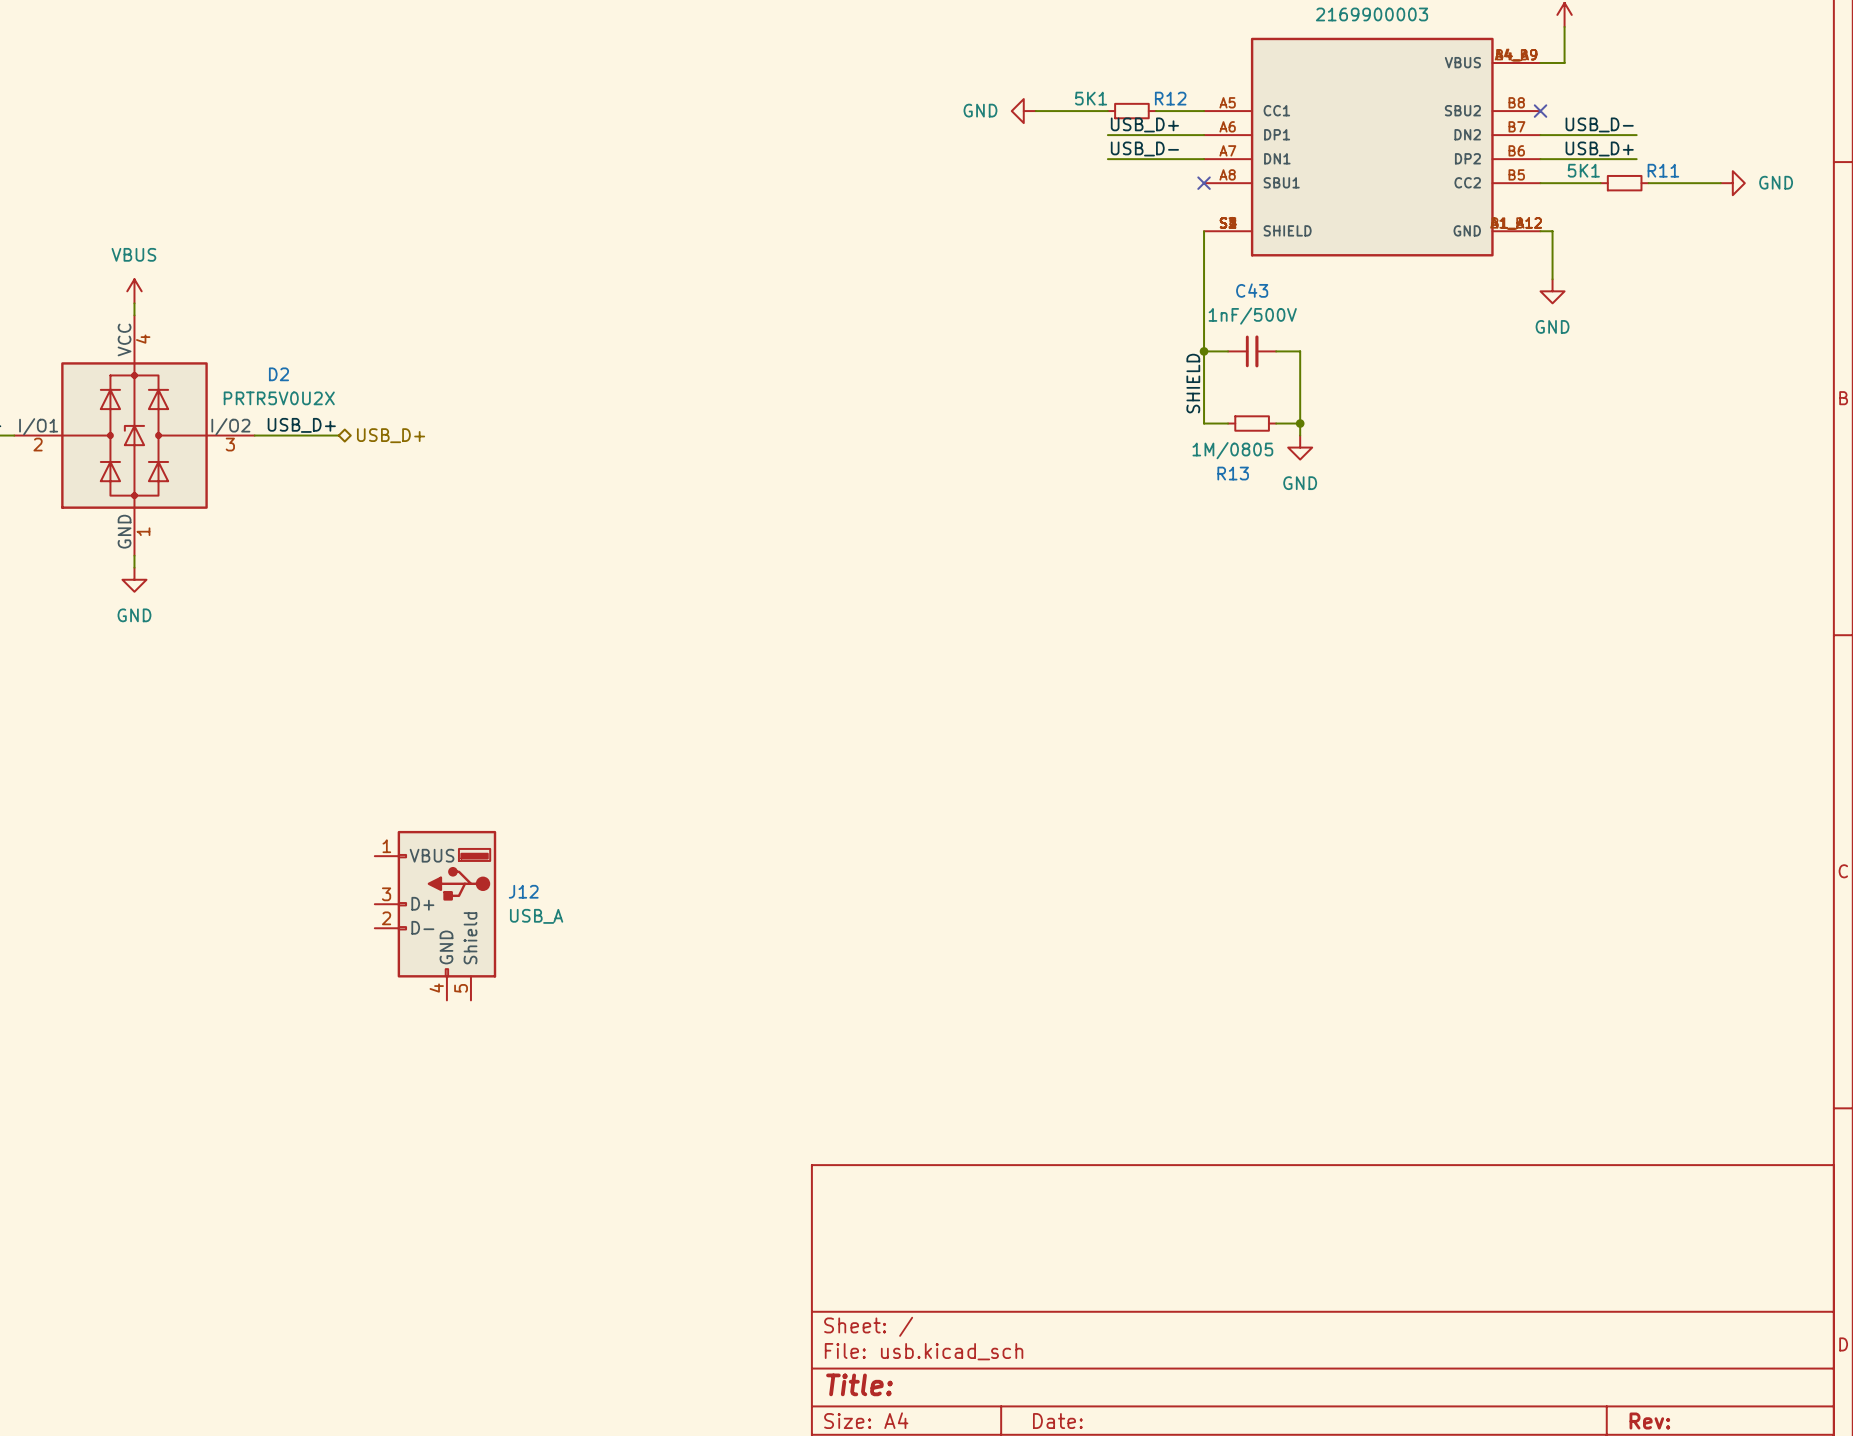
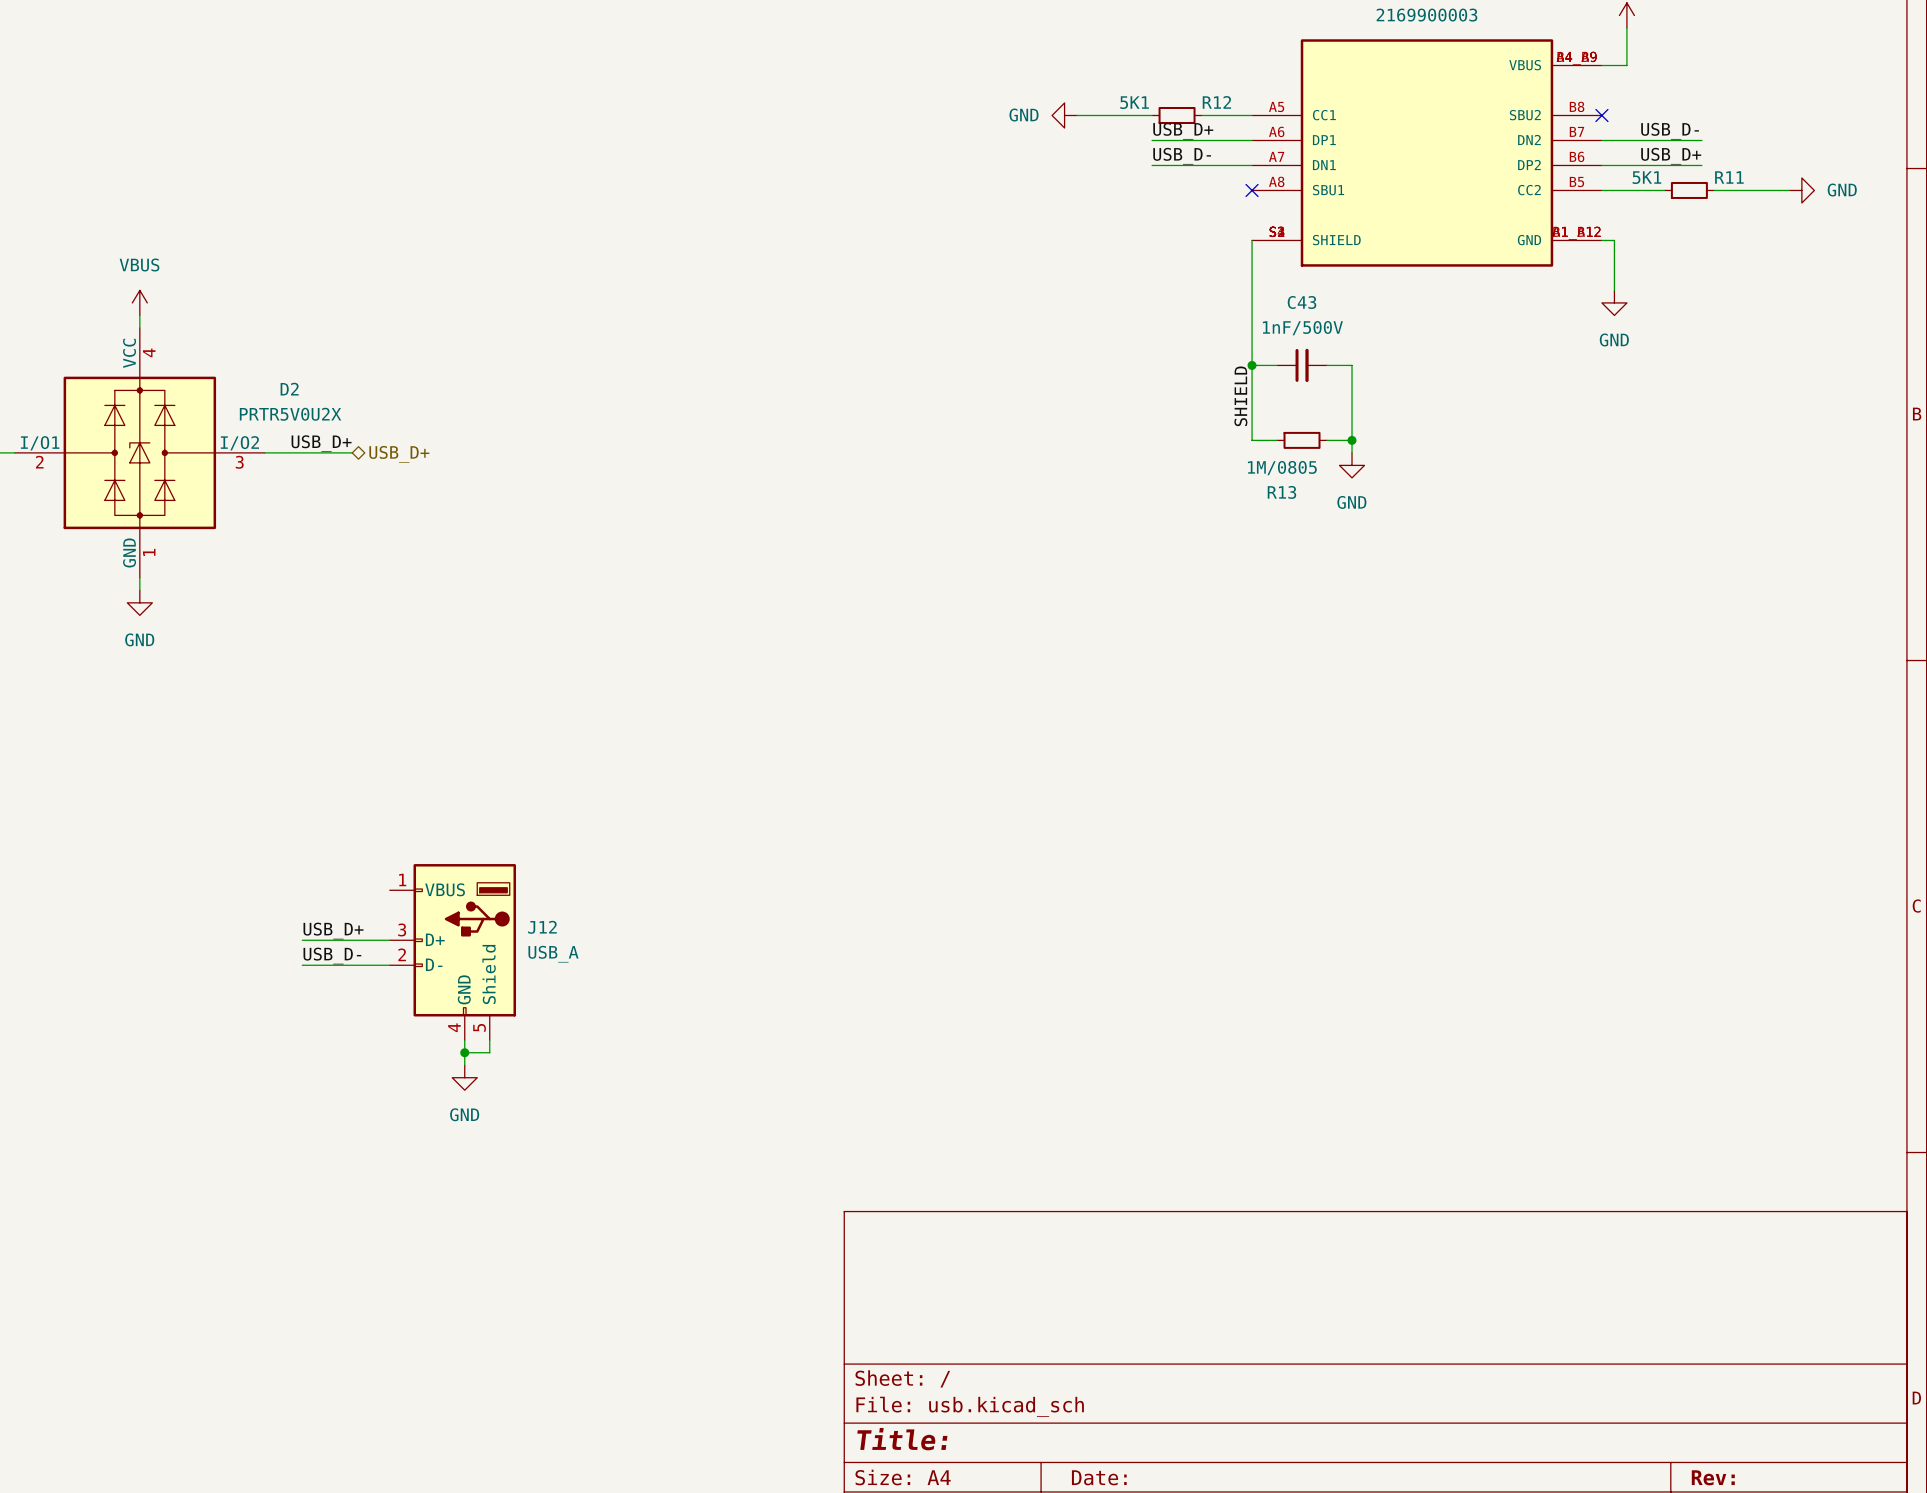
label: none -> USB_D+ (333, 931)
wire: none -> (302, 940) (389, 940)
label: none -> USB_D- (332, 956)
wire: none -> (302, 965) (389, 965)
wire: none -> (464, 1040) (464, 1065)
wire: none -> (489, 1040) (489, 1052) (464, 1052)
junction: none -> (464, 1052)
power symbol: none -> GND (464, 1077)

